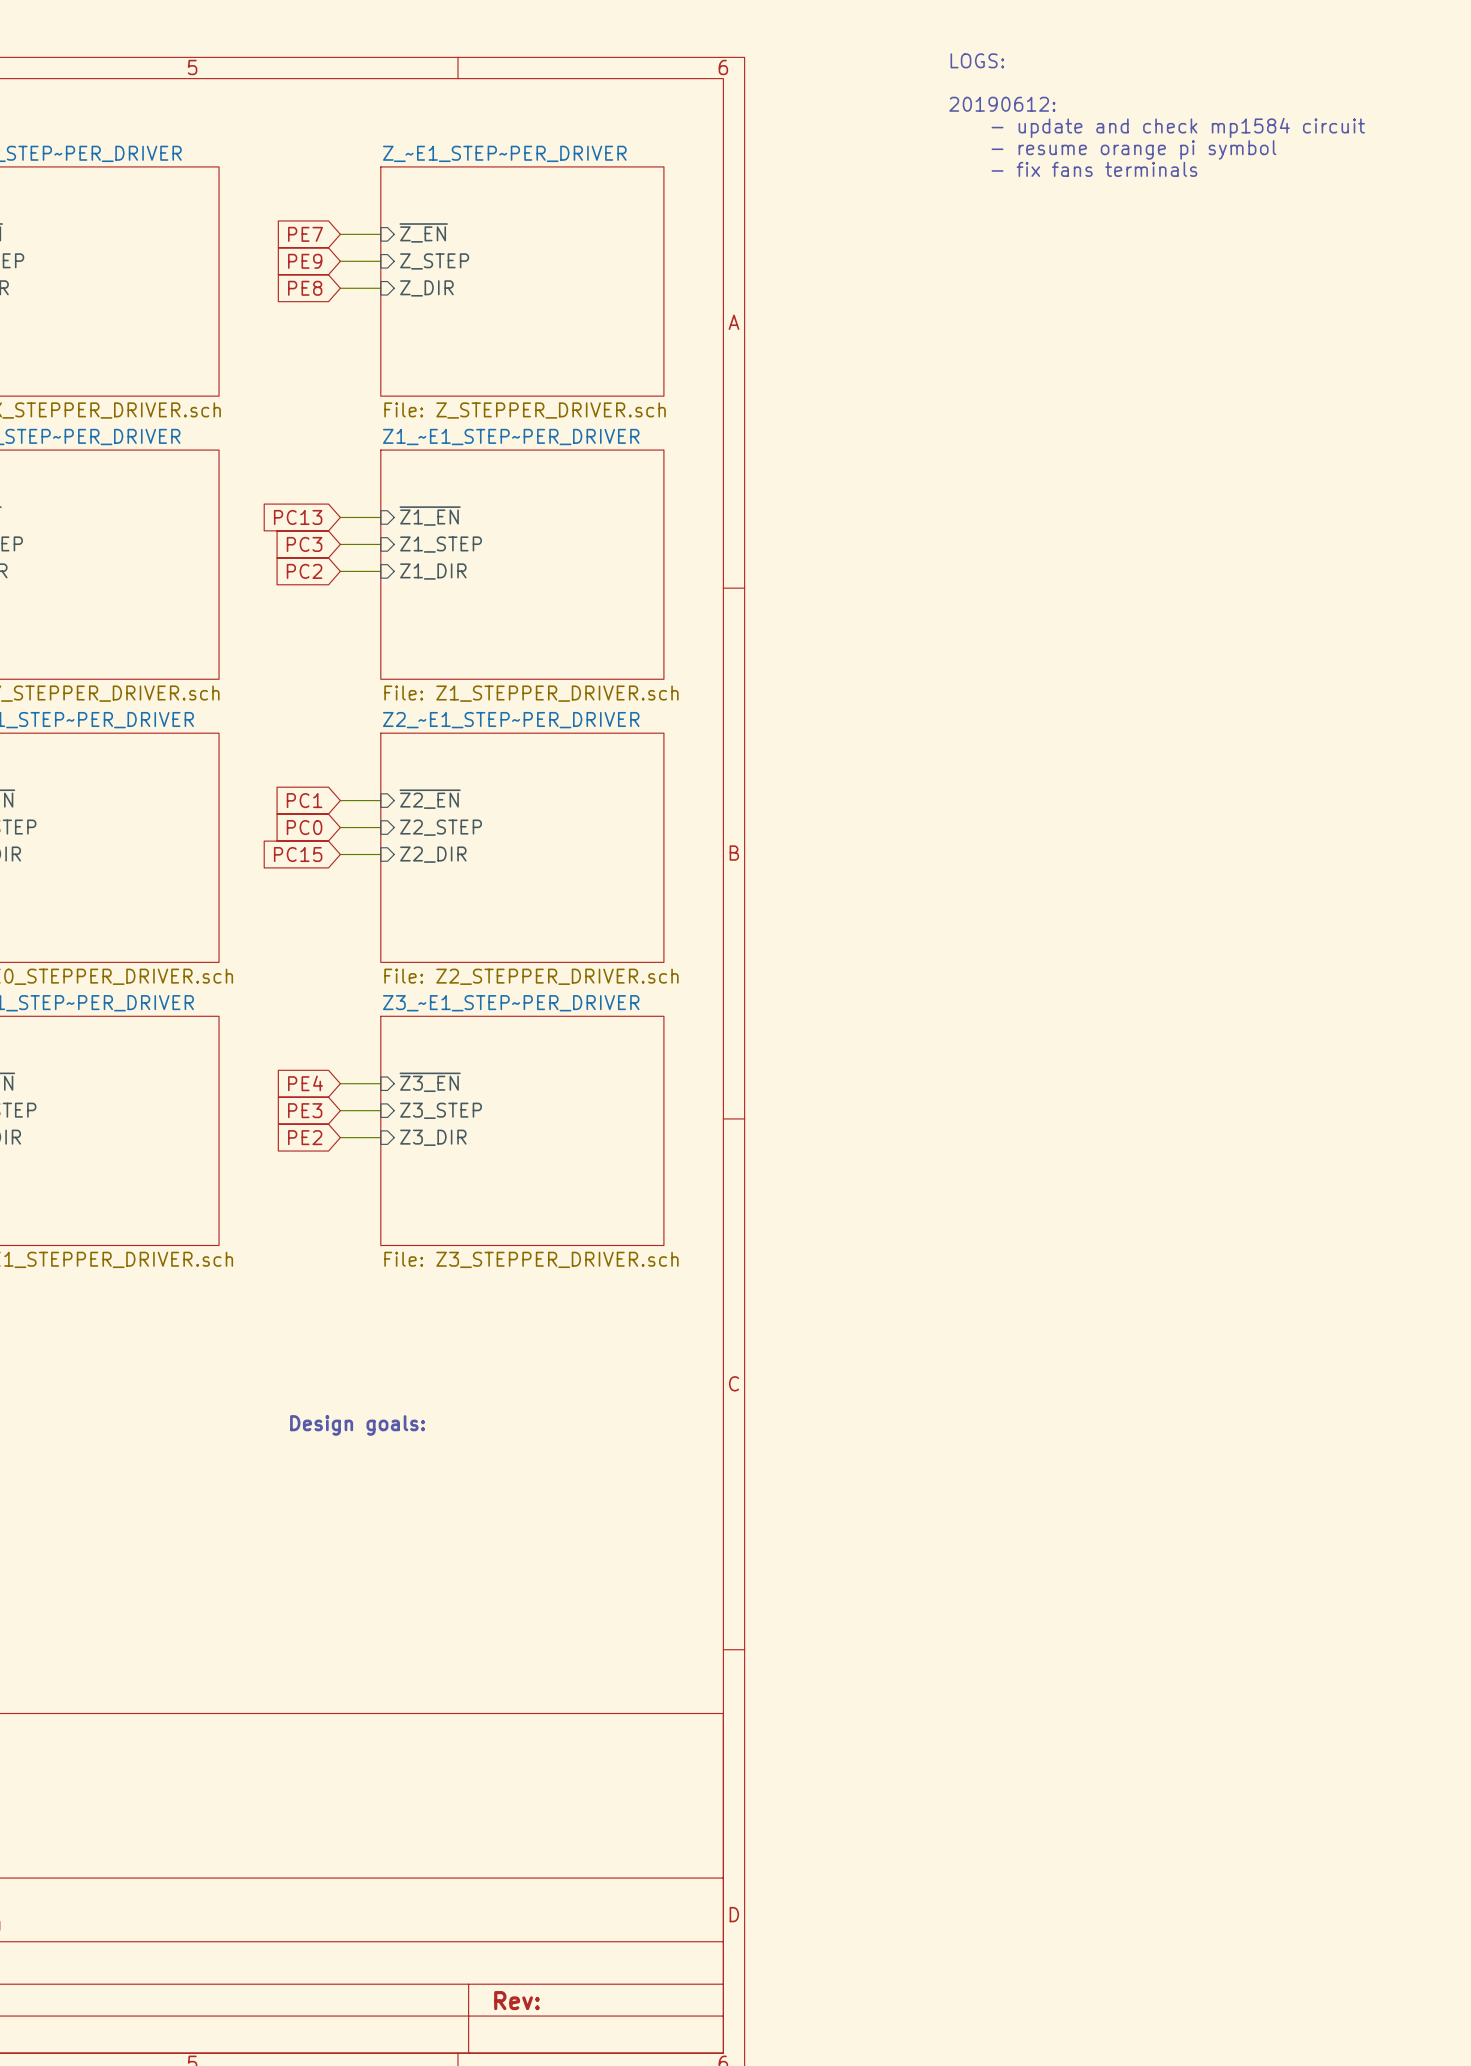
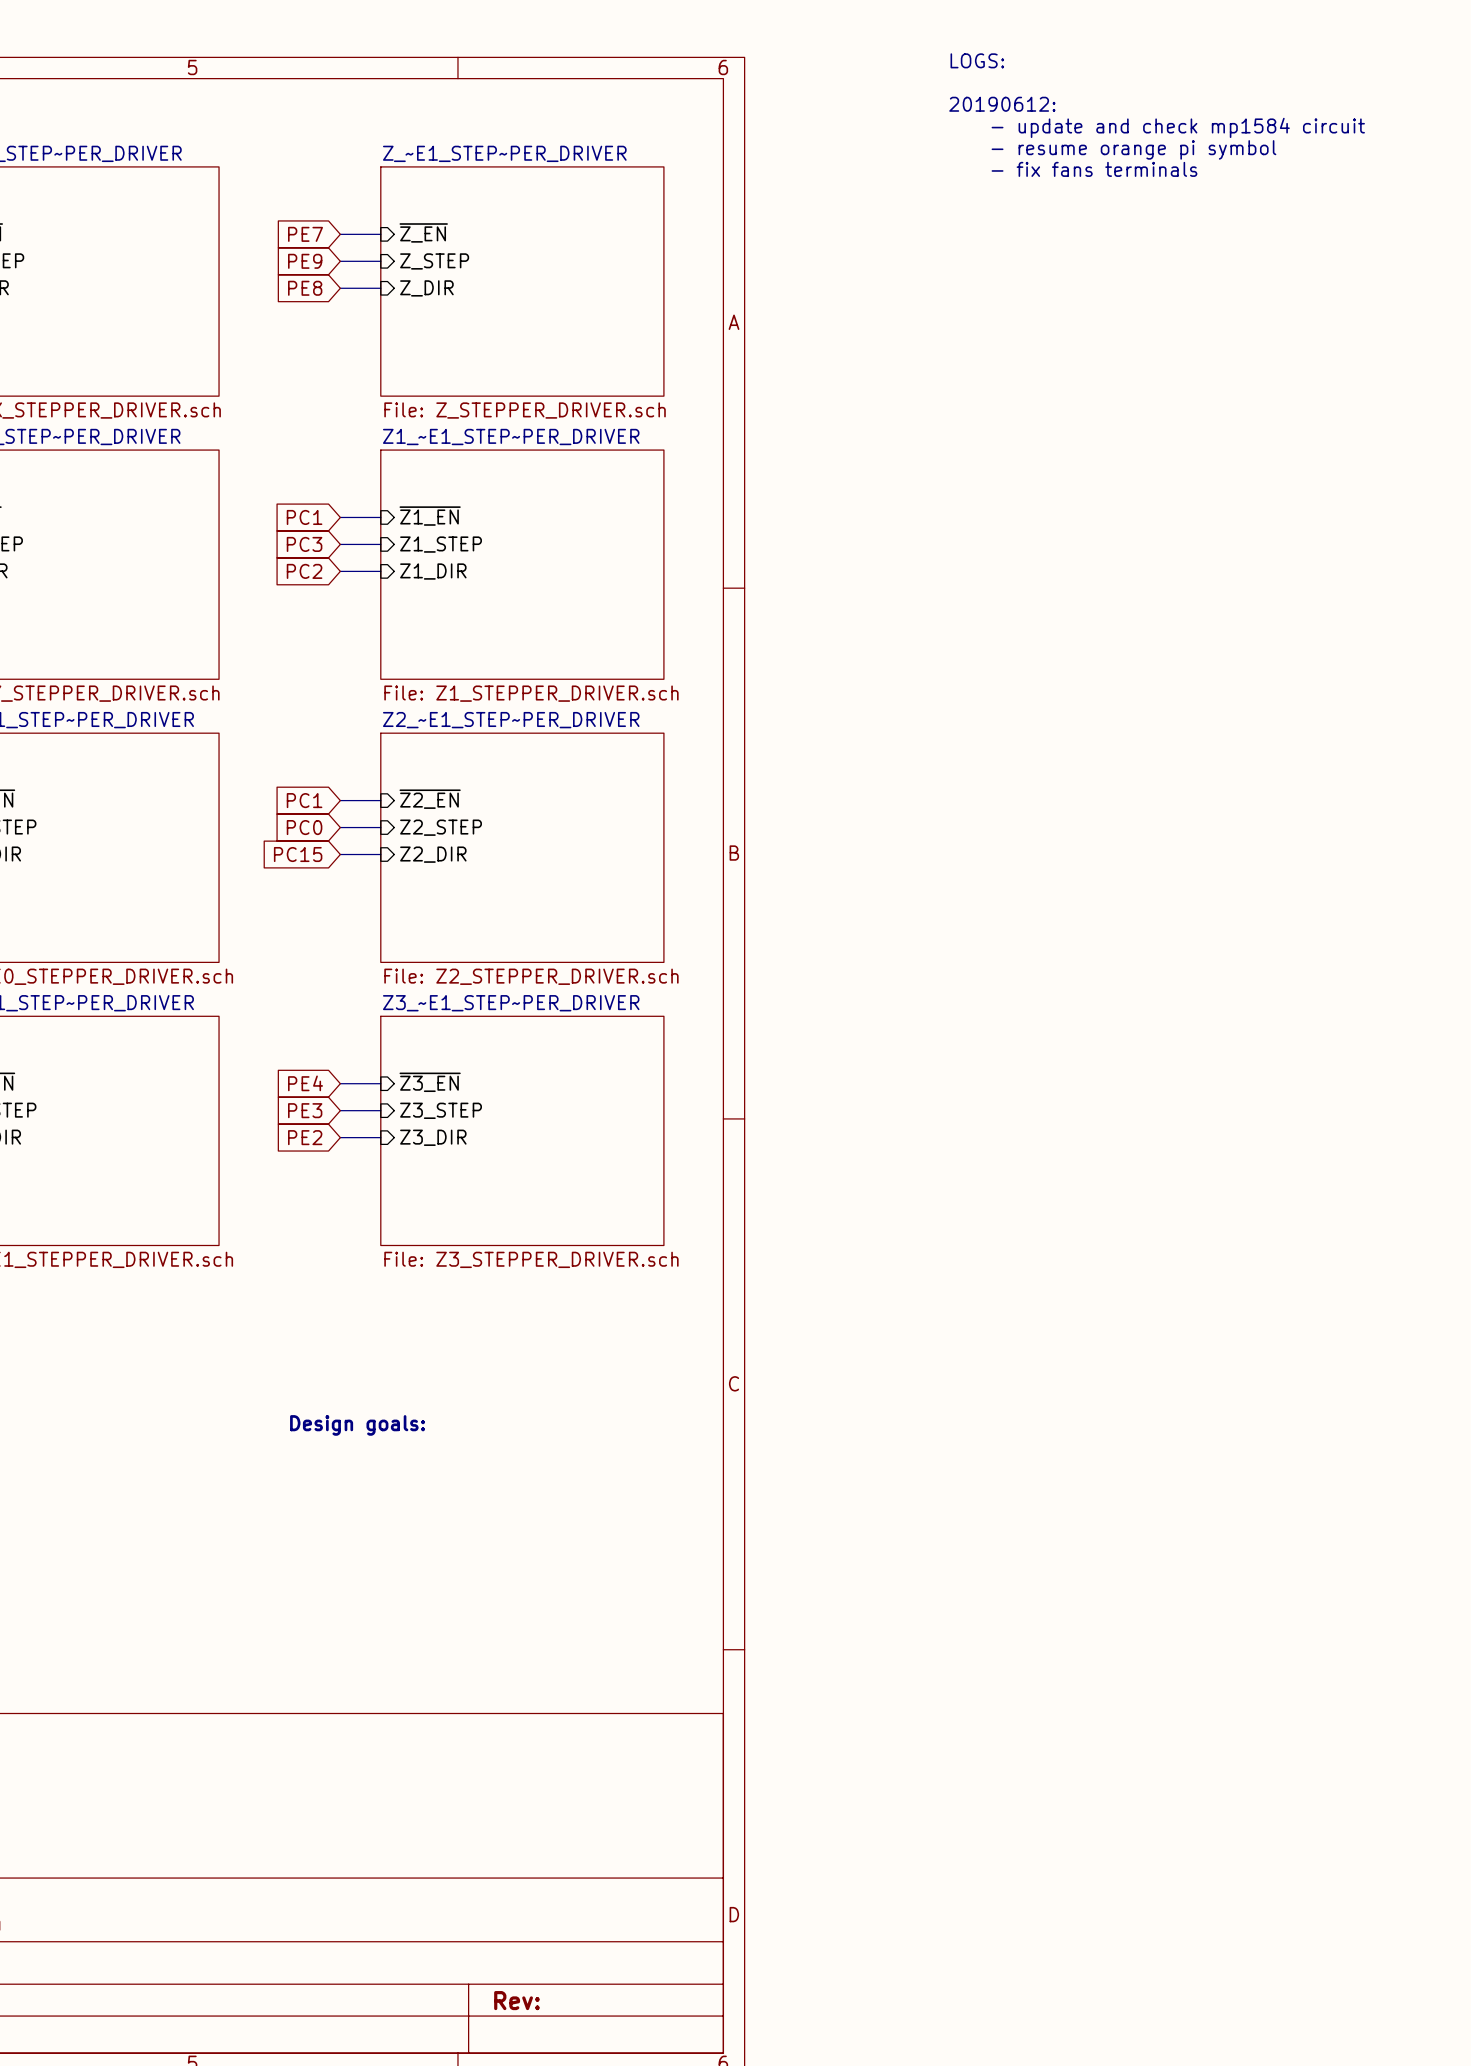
global label: PC13 (298, 517) -> PC1 (304, 517)

